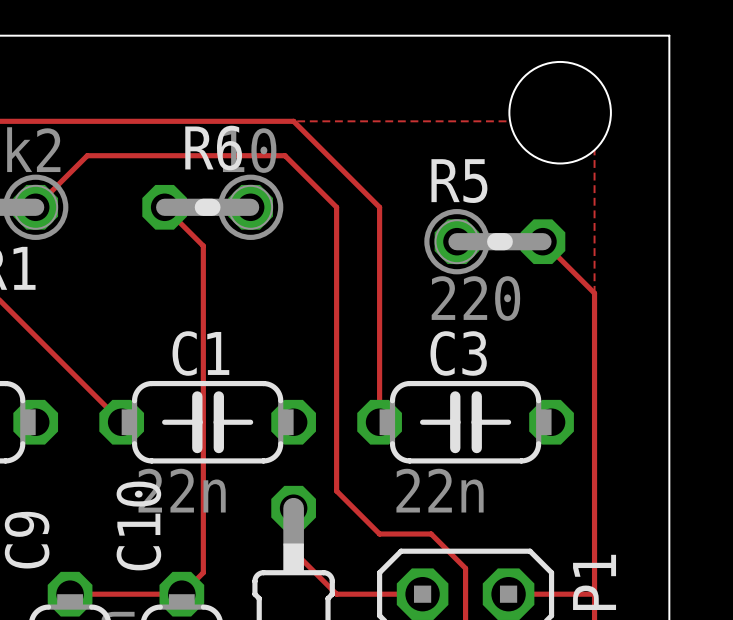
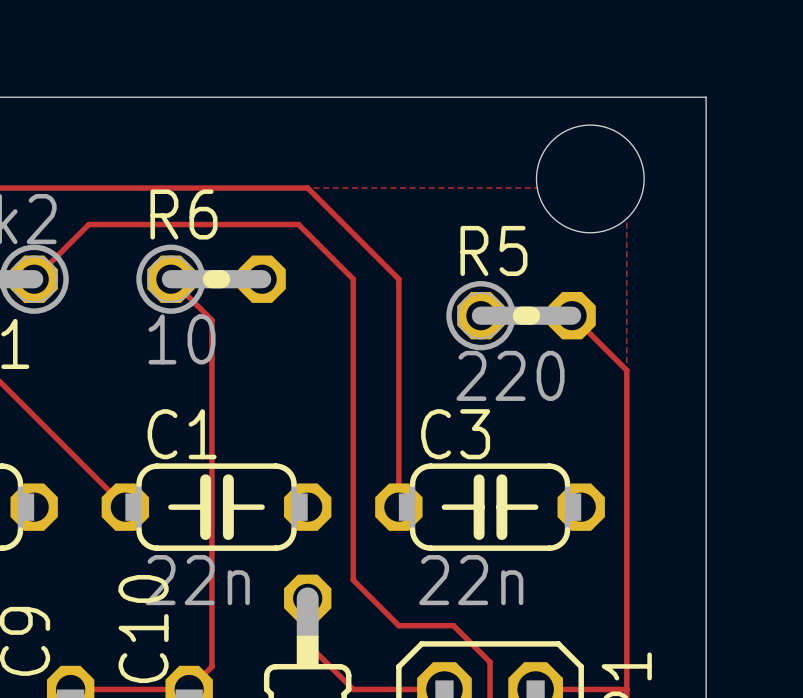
R6 rotation: 0° (212, 207) -> 180° (211, 279)
C1 name position: C1 (200, 353) -> C1 (182, 434)
C3 name position: C3 (458, 353) -> C3 (455, 434)

